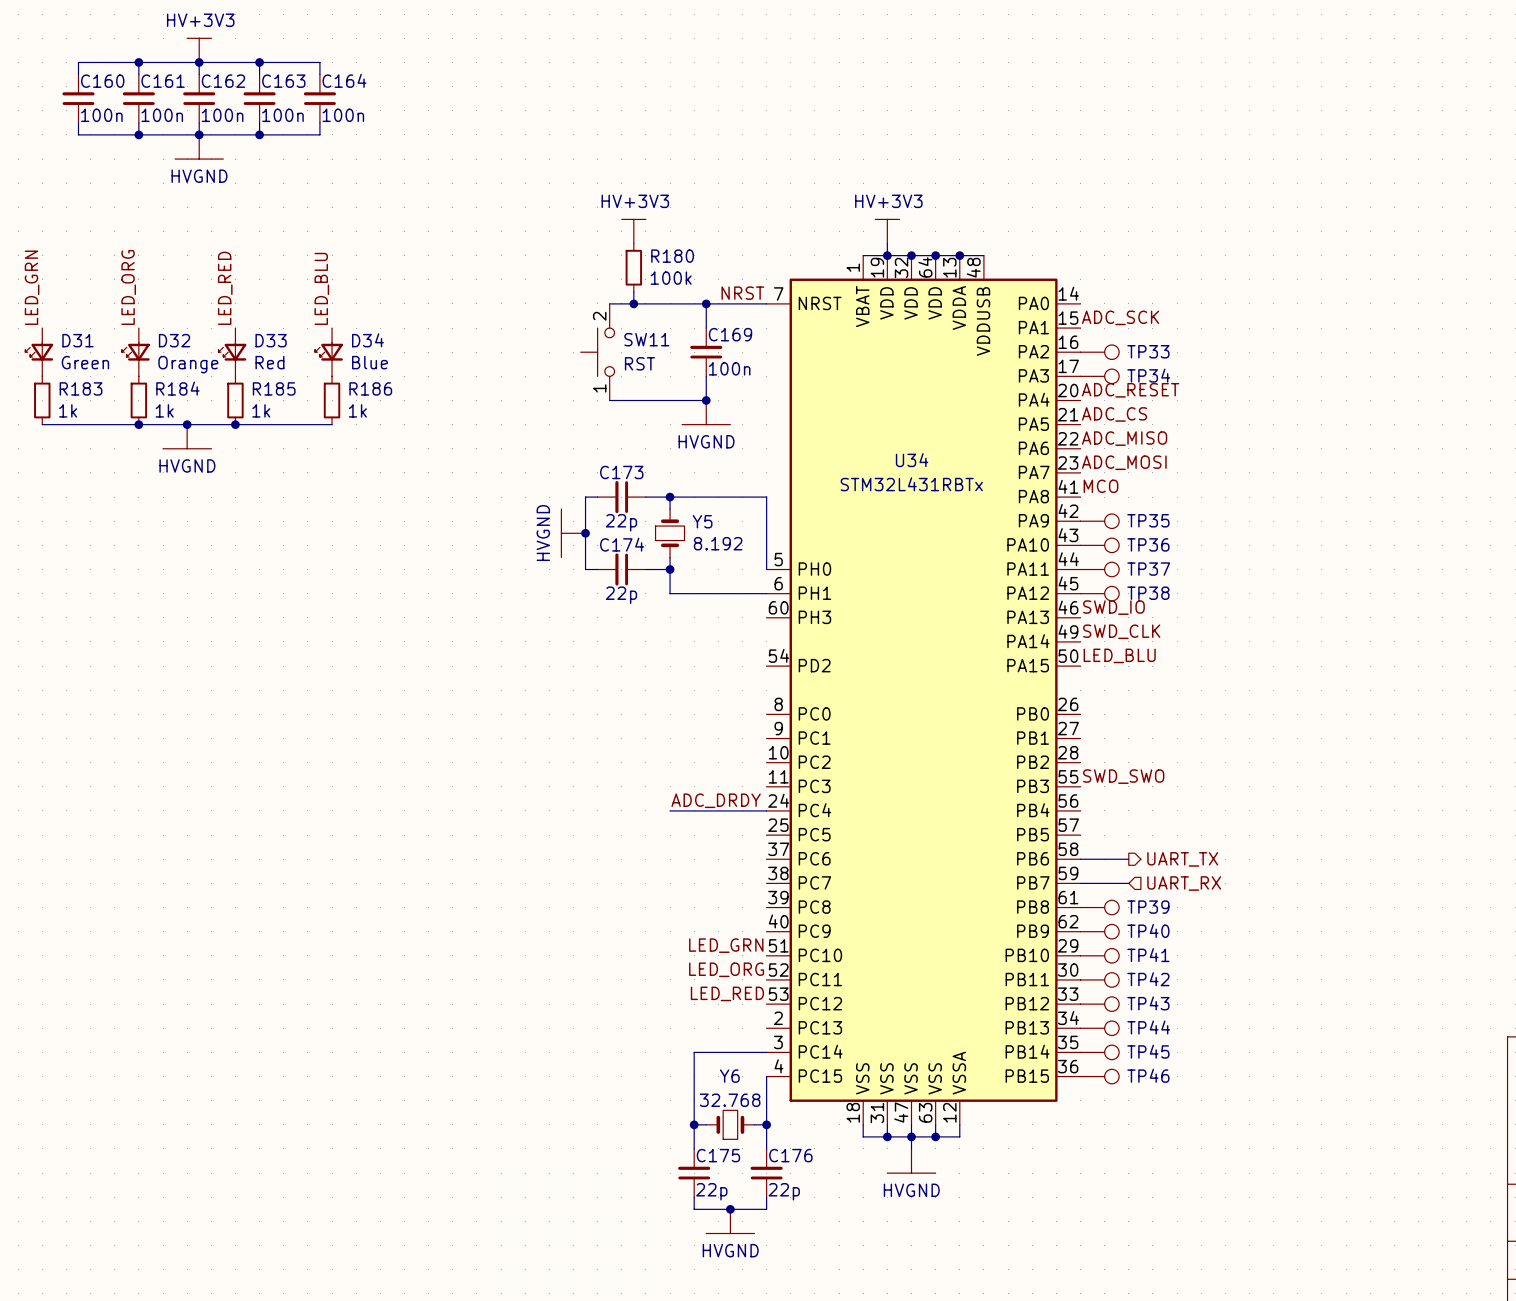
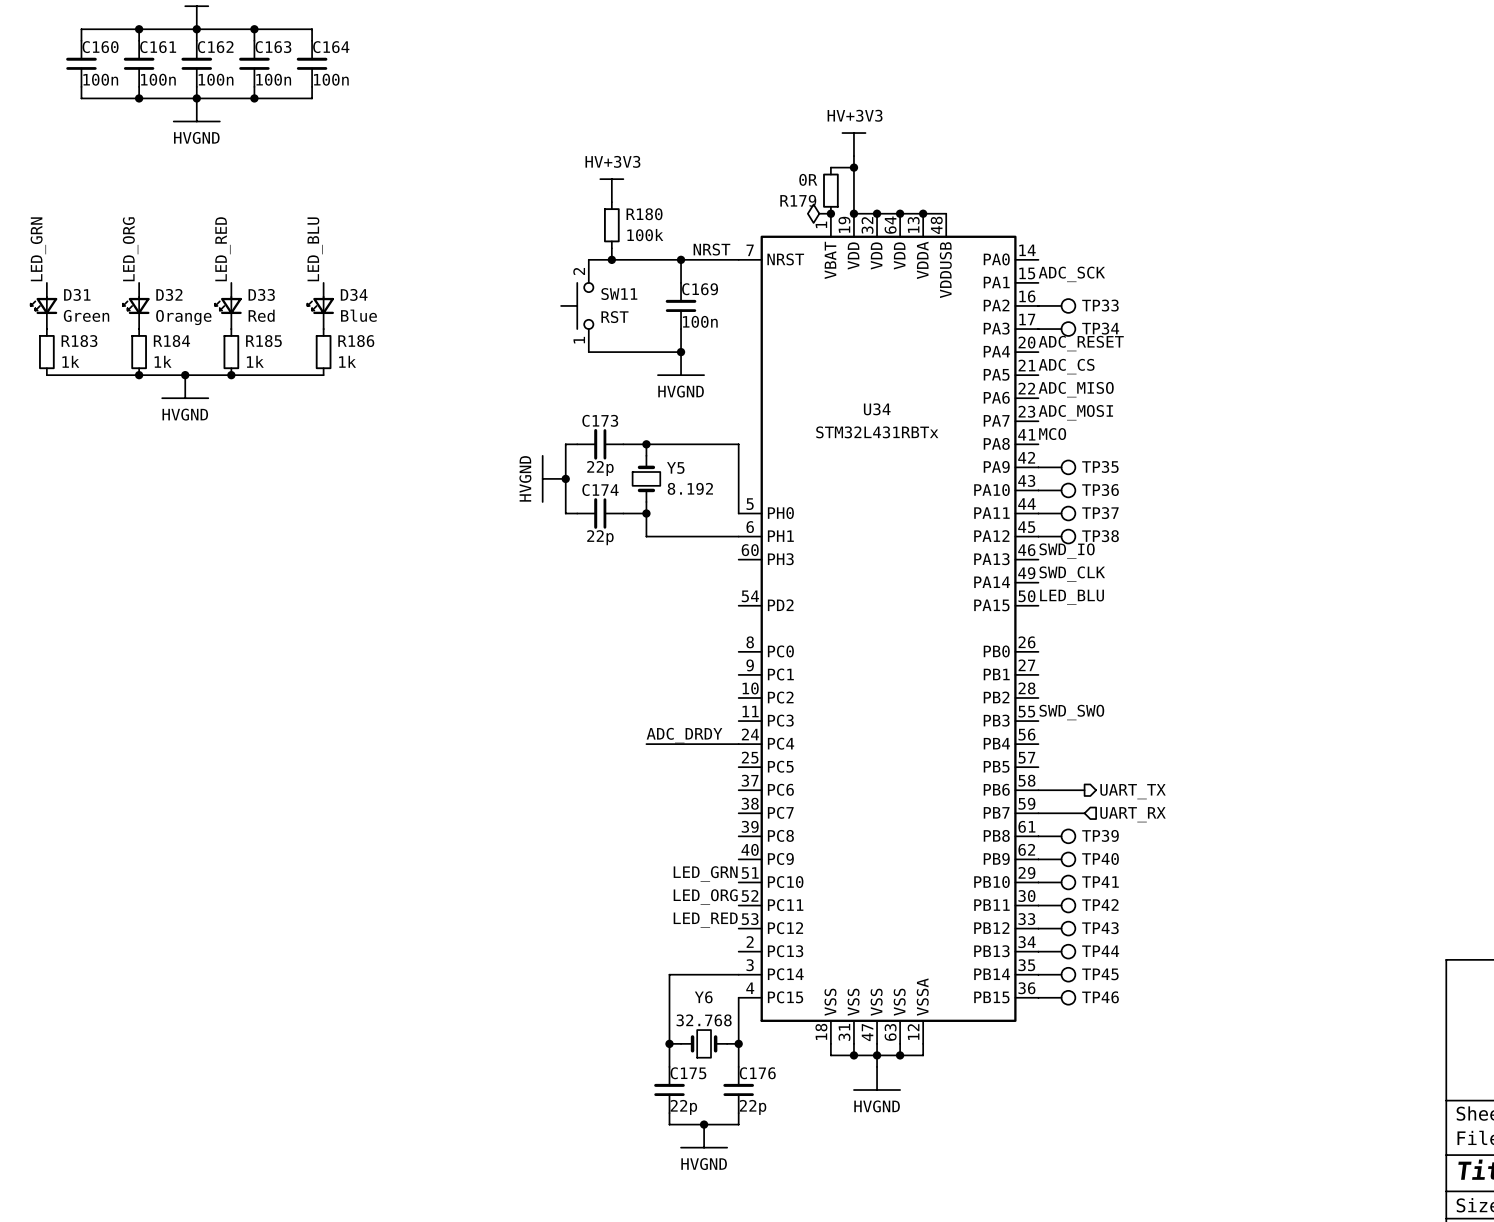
junction: none -> (853, 167)
R179: none -> 0R (830, 190)
power symbol position: HV+3V3 (887, 231) -> HV+3V3 (853, 144)
power symbol: none -> (819, 213)
wire: (863, 255) (887, 255) -> (830, 167) (853, 167)
junction: none -> (830, 213)

